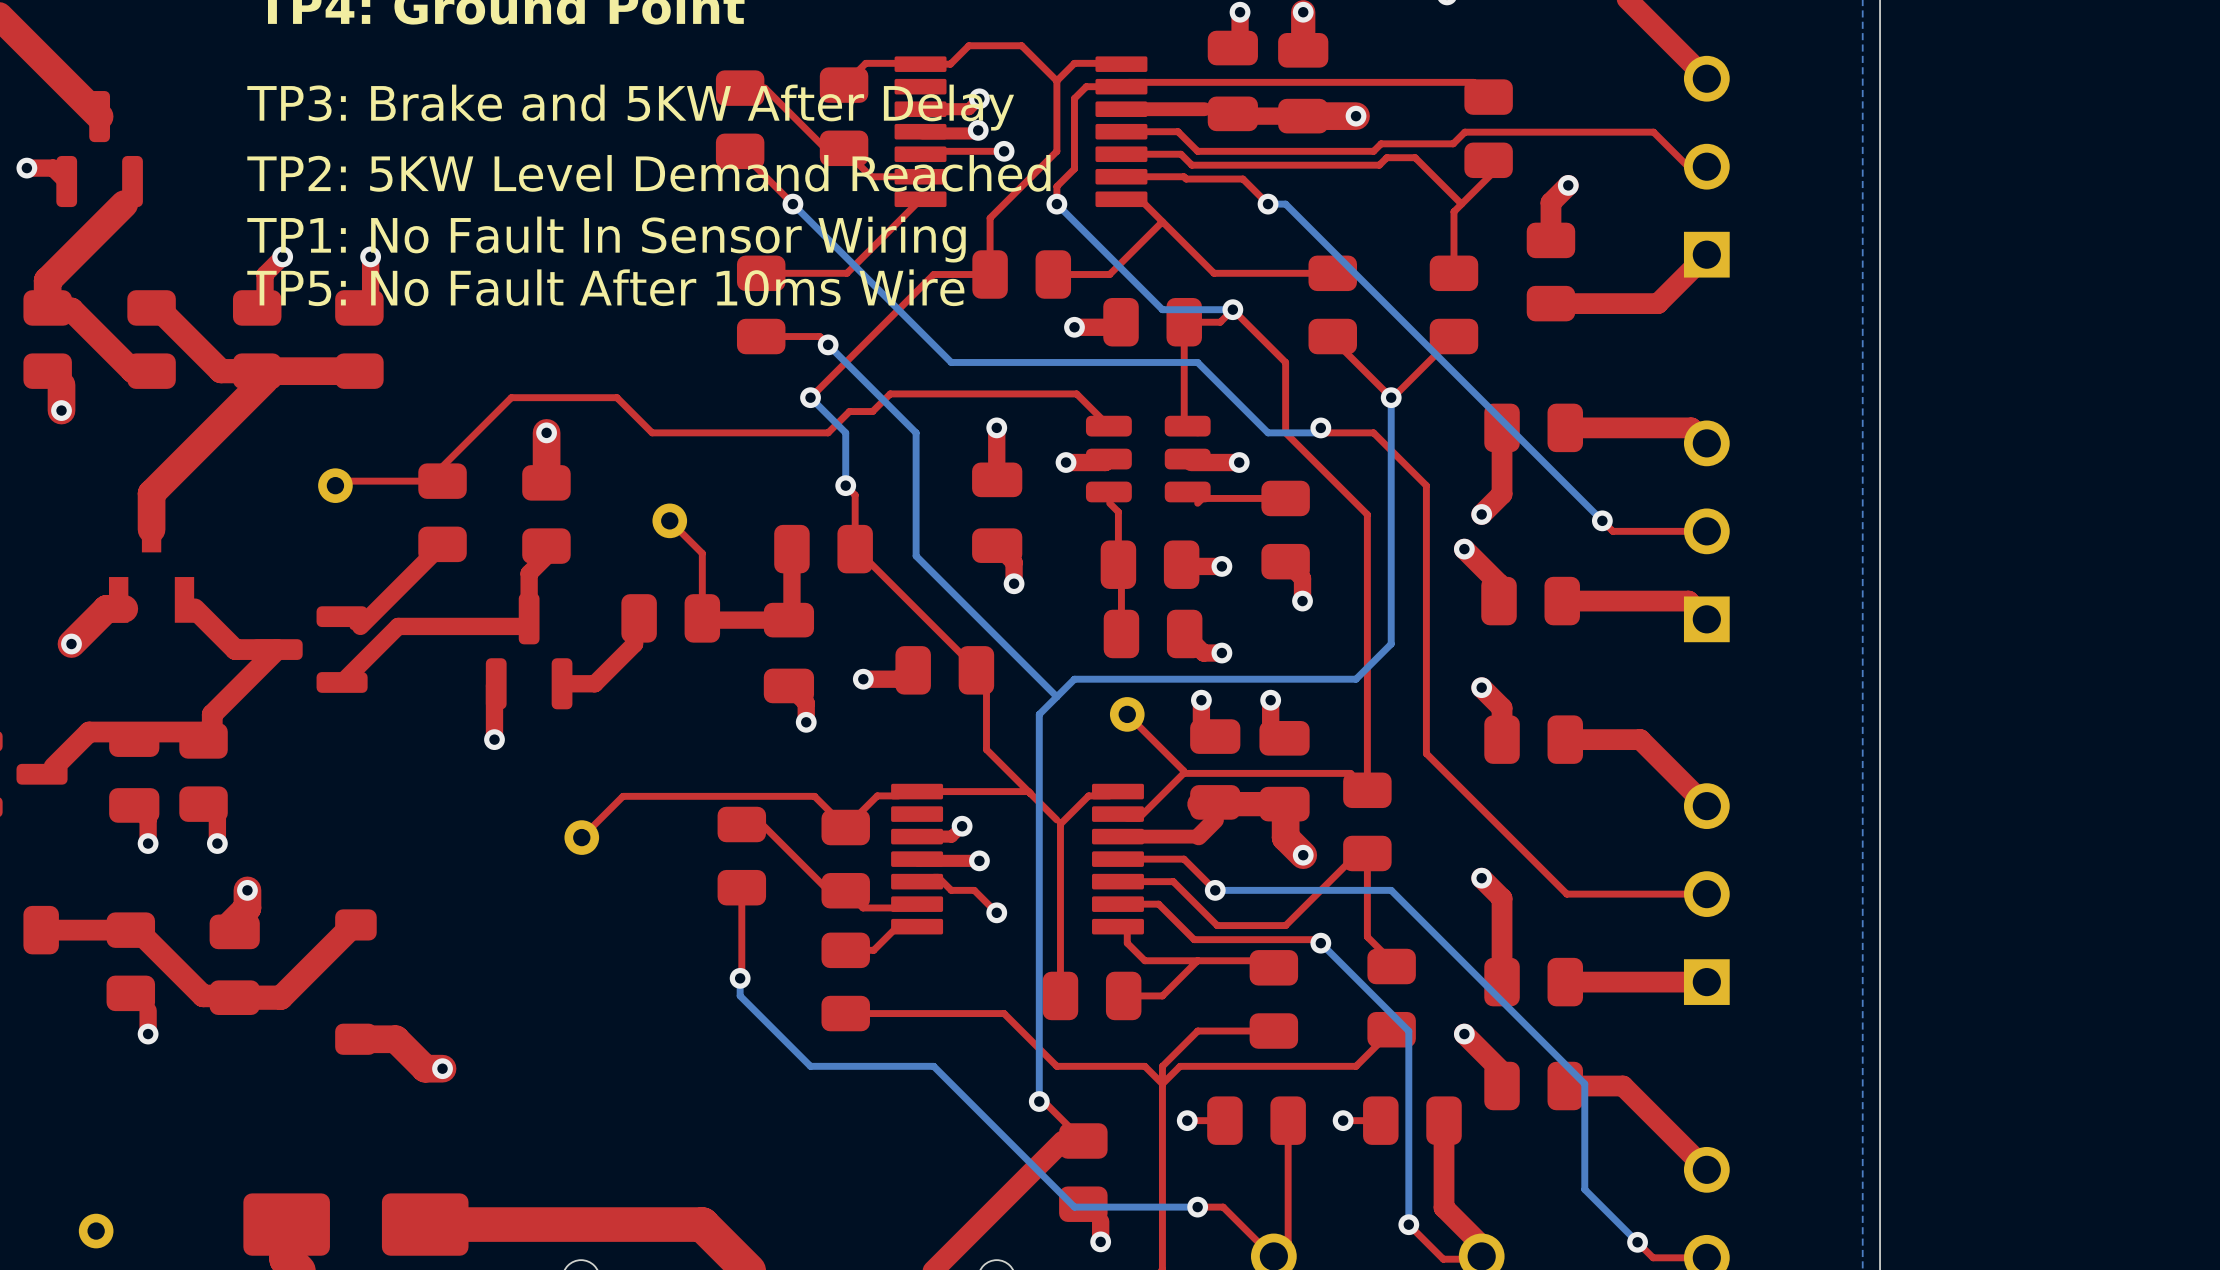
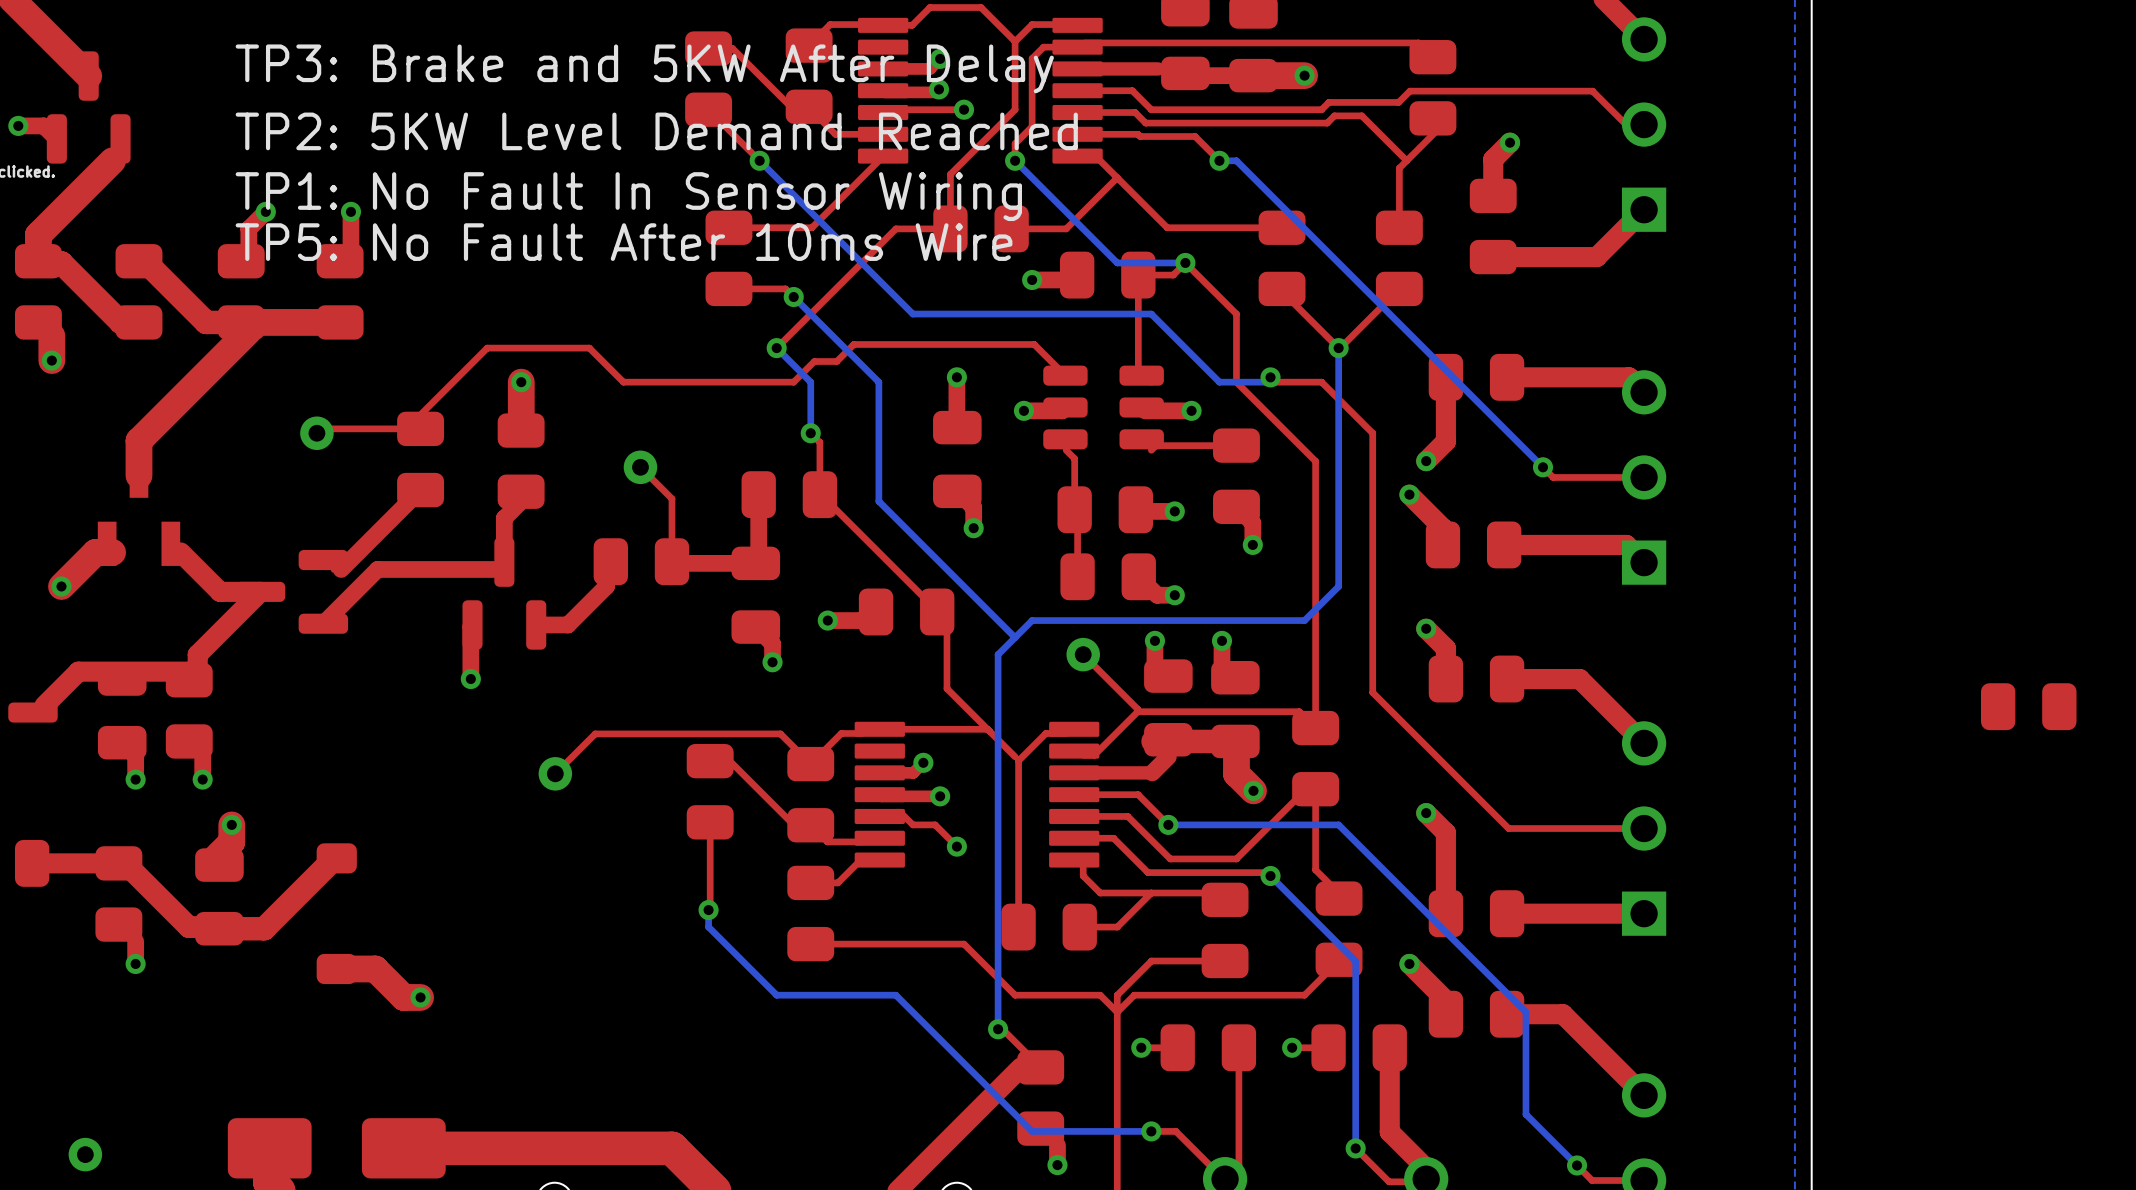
part: none -> (2028, 706)

